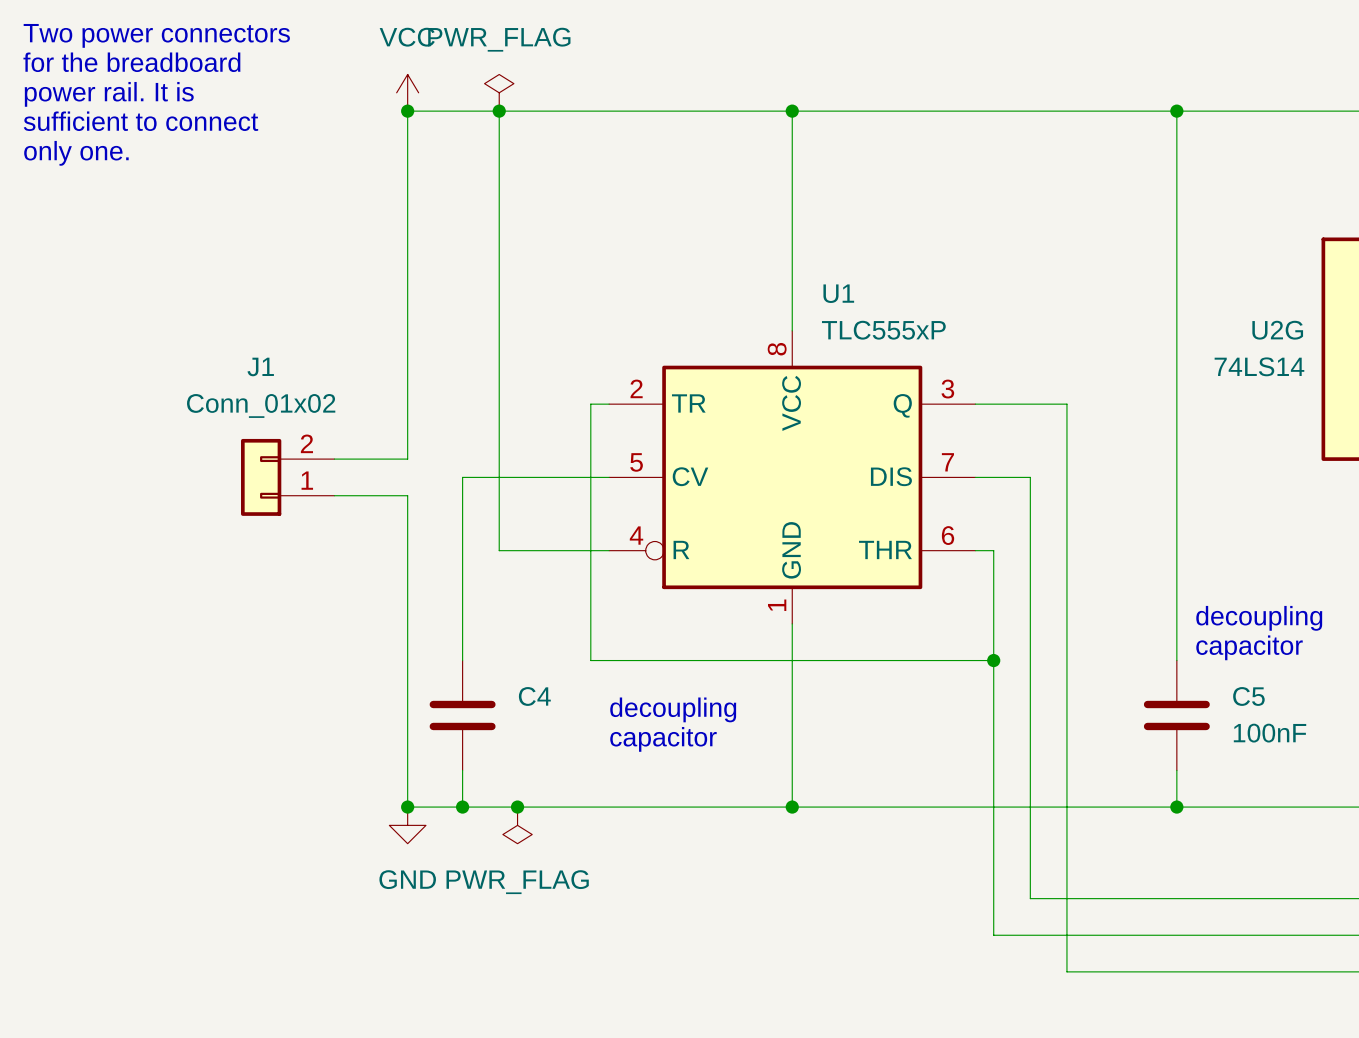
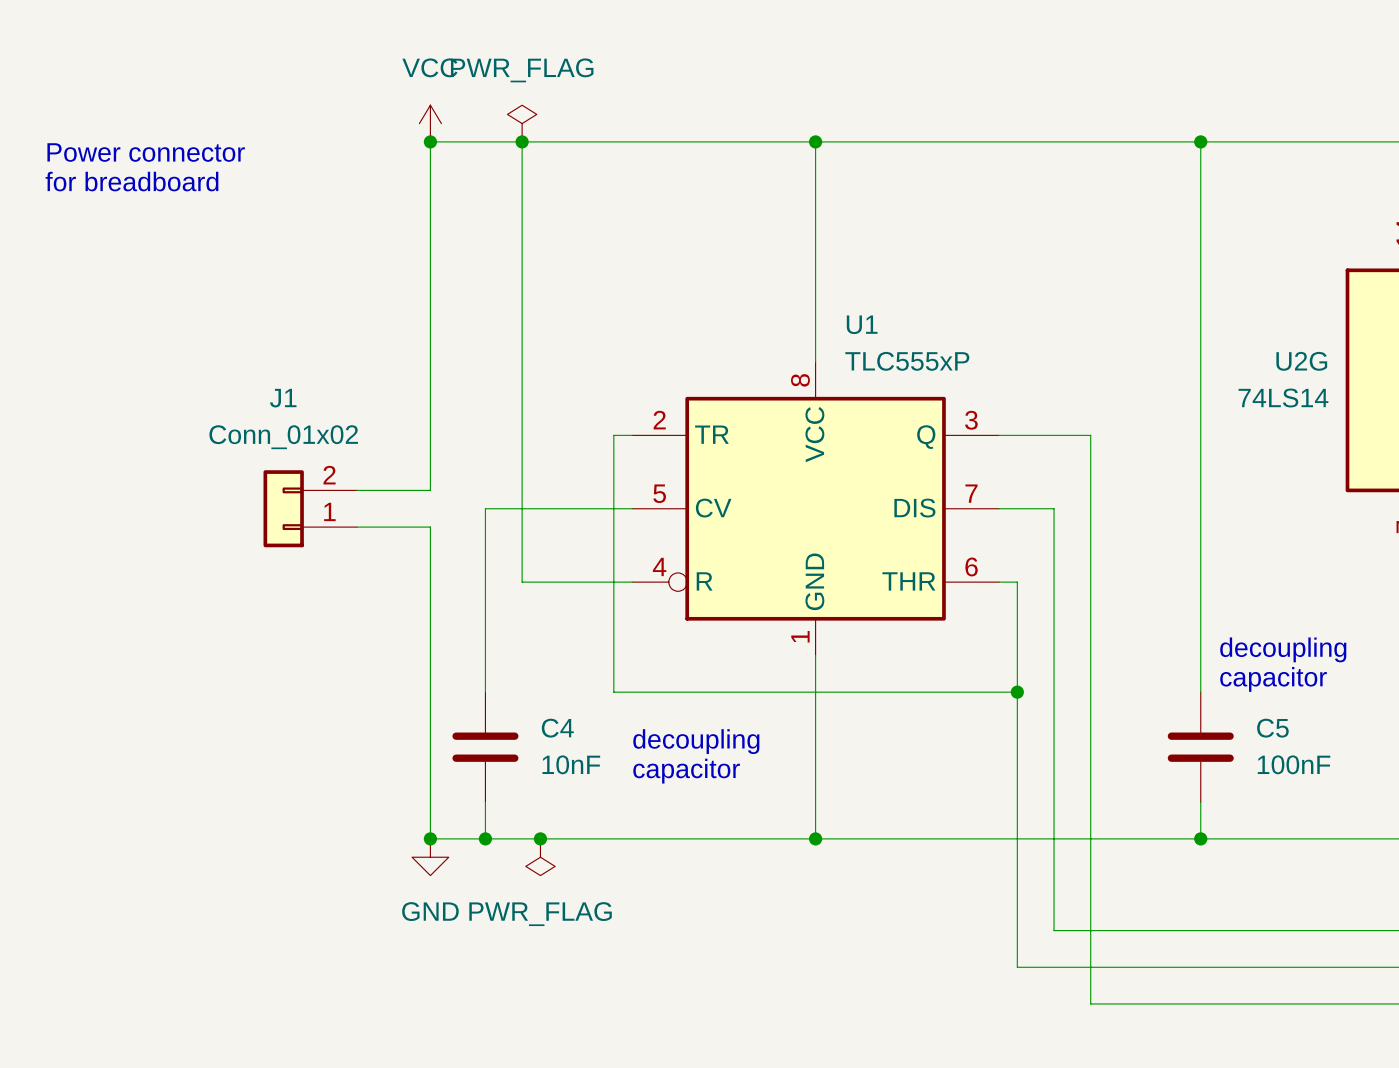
text: Two power connectors (156, 35) -> none
text: for the breadboard (131, 62) -> none
text: power rail. It is (109, 94) -> none
text: sufficient to connect (140, 121) -> Power connector (146, 152)
text: only one. (76, 153) -> for breadboard (132, 181)
C4 value: none -> 10nF (571, 764)

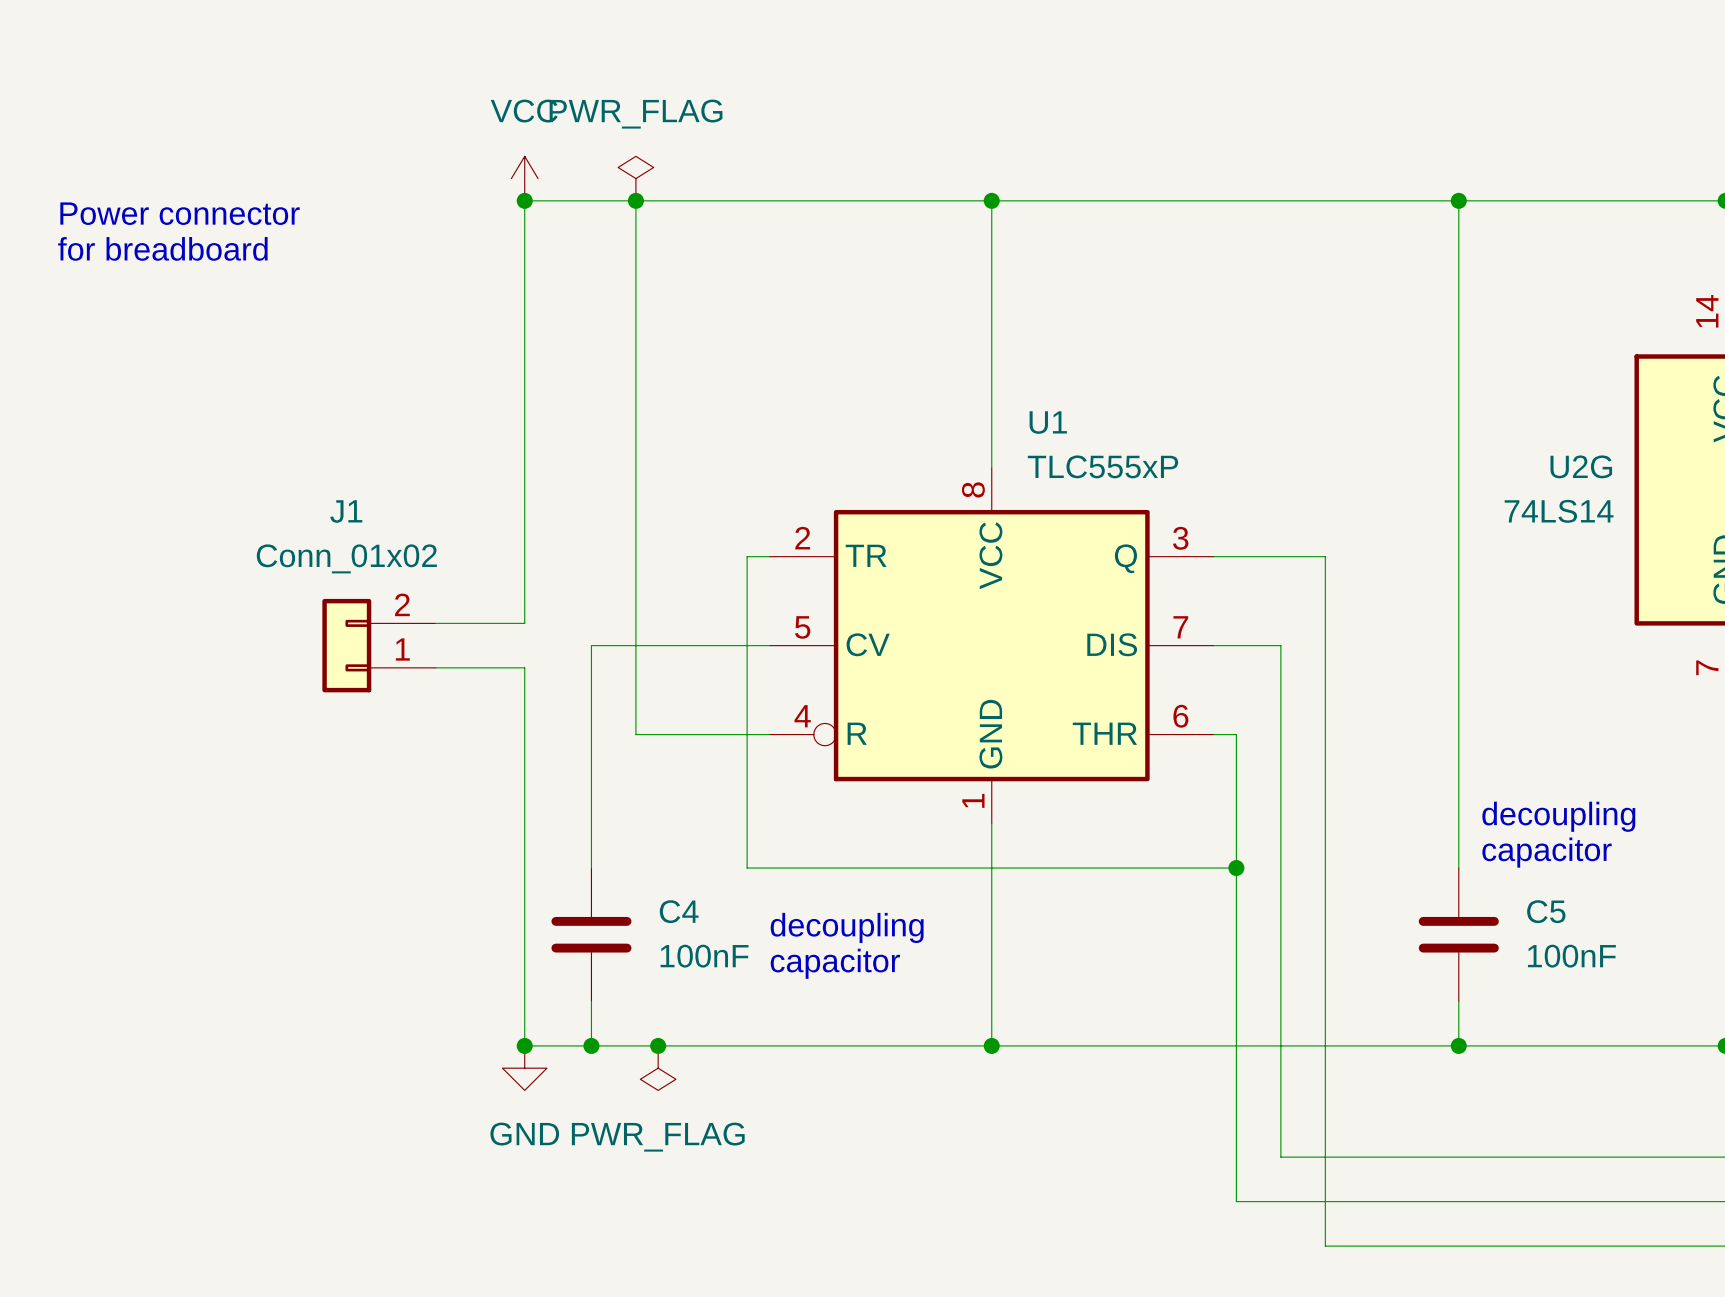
C4 value: 10nF (571, 764) -> 100nF (704, 956)

